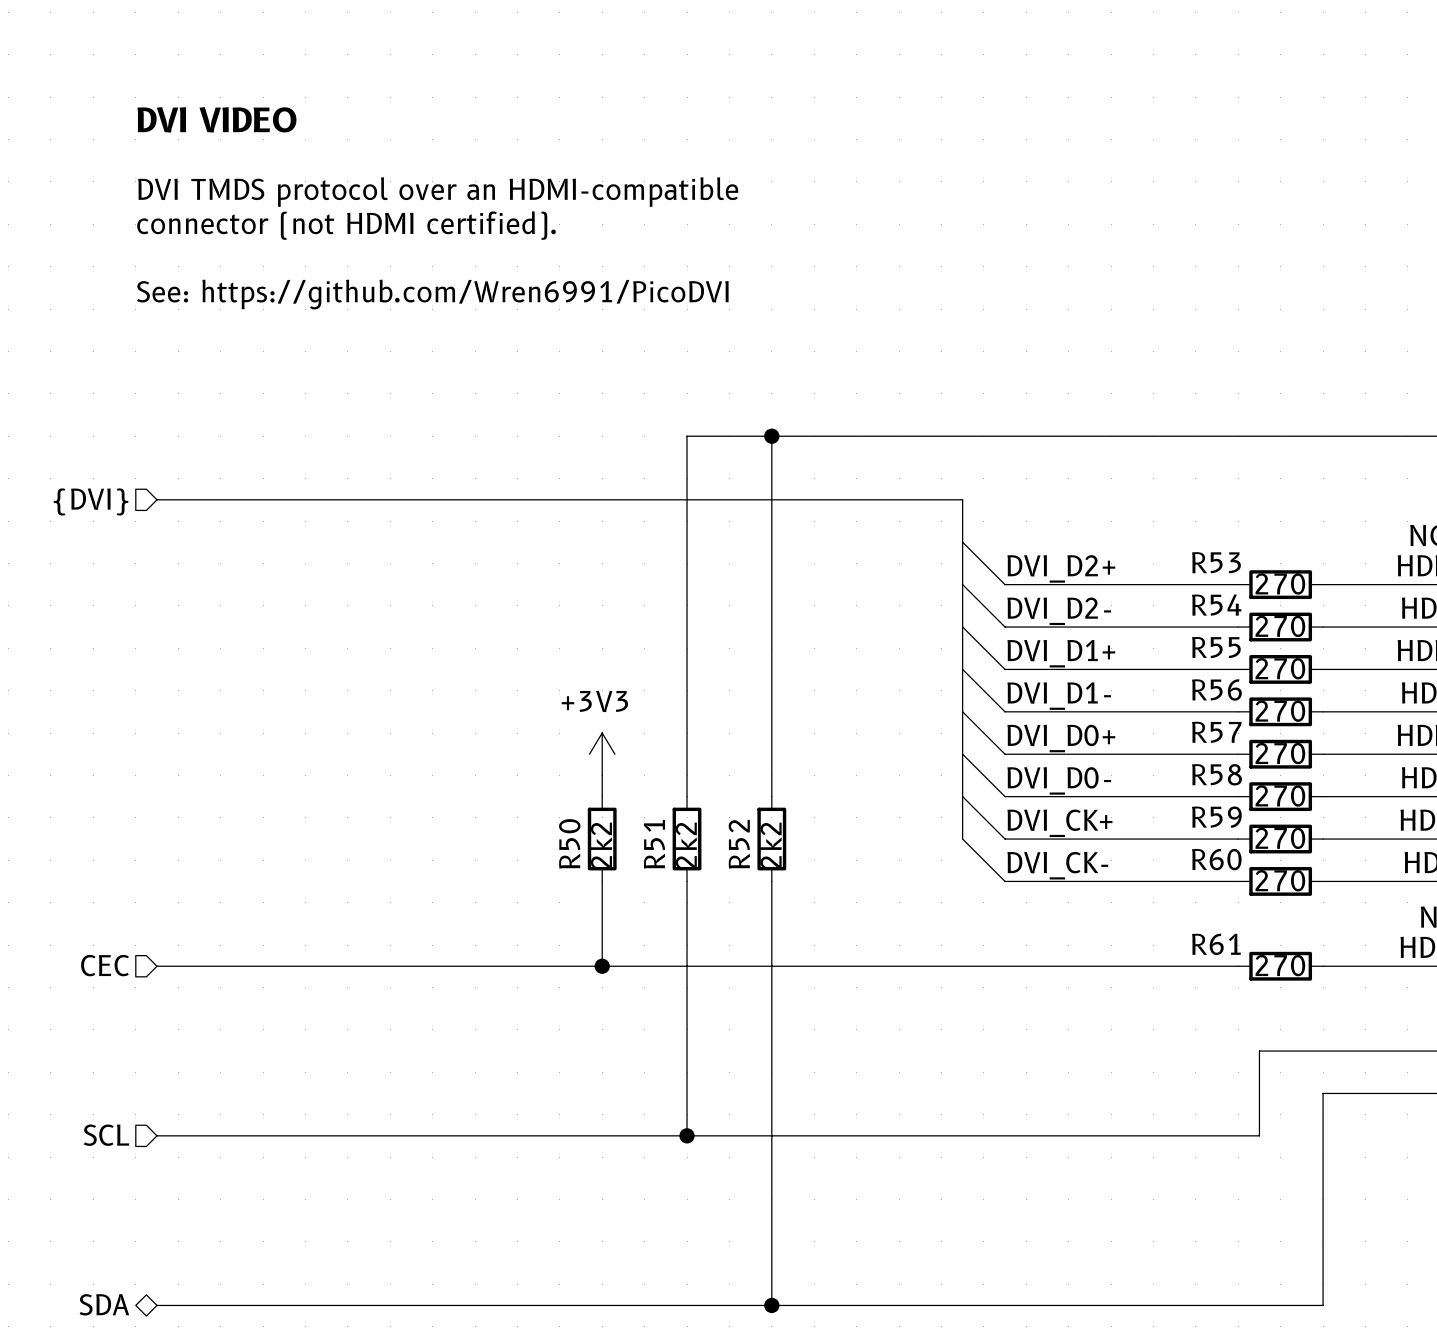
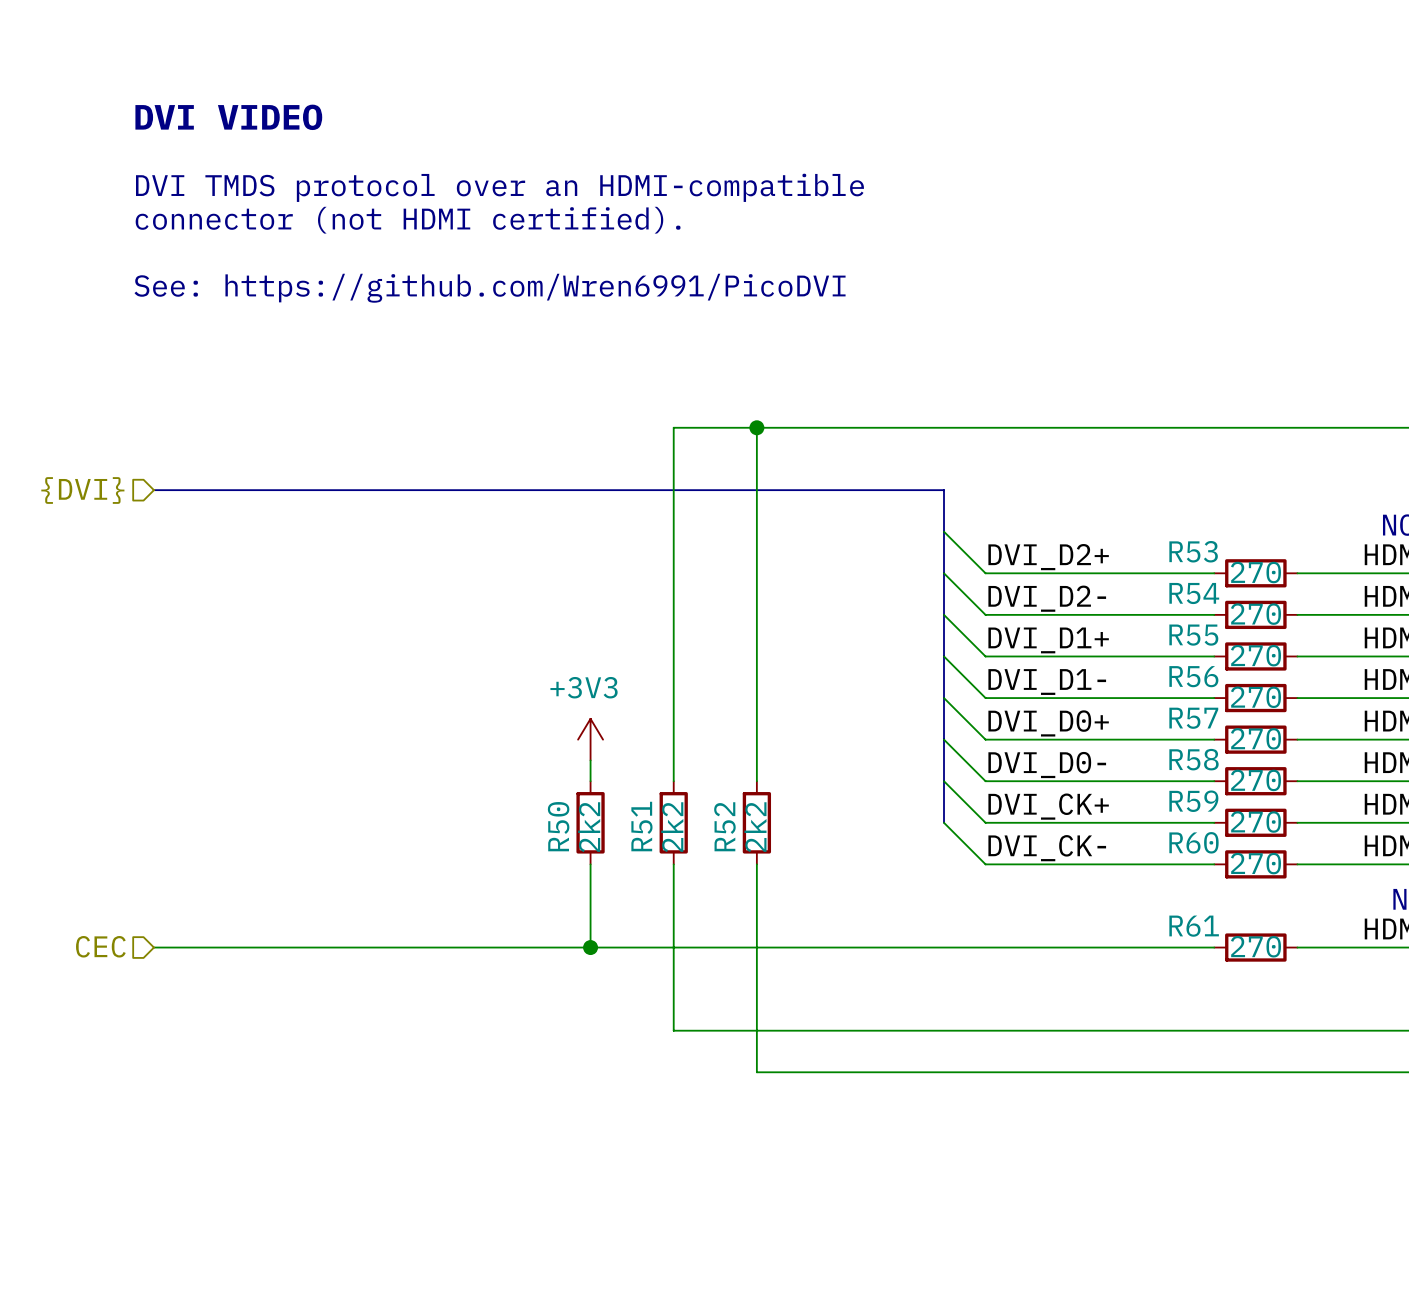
wire: (687, 1051) (687, 1135) -> none
wire: (1259, 1051) (1259, 1135) (157, 1135) -> (1235, 1030) (673, 1030)
wire: (771, 1093) (771, 1305) -> (756, 1072) (1297, 1072)
wire: (1323, 1093) (1323, 1305) (157, 1305) -> none
hierarchical label: SCL (106, 1135) -> none
junction: (687, 1135) -> none
hierarchical label: SDA (104, 1304) -> none
junction: (771, 1305) -> none

